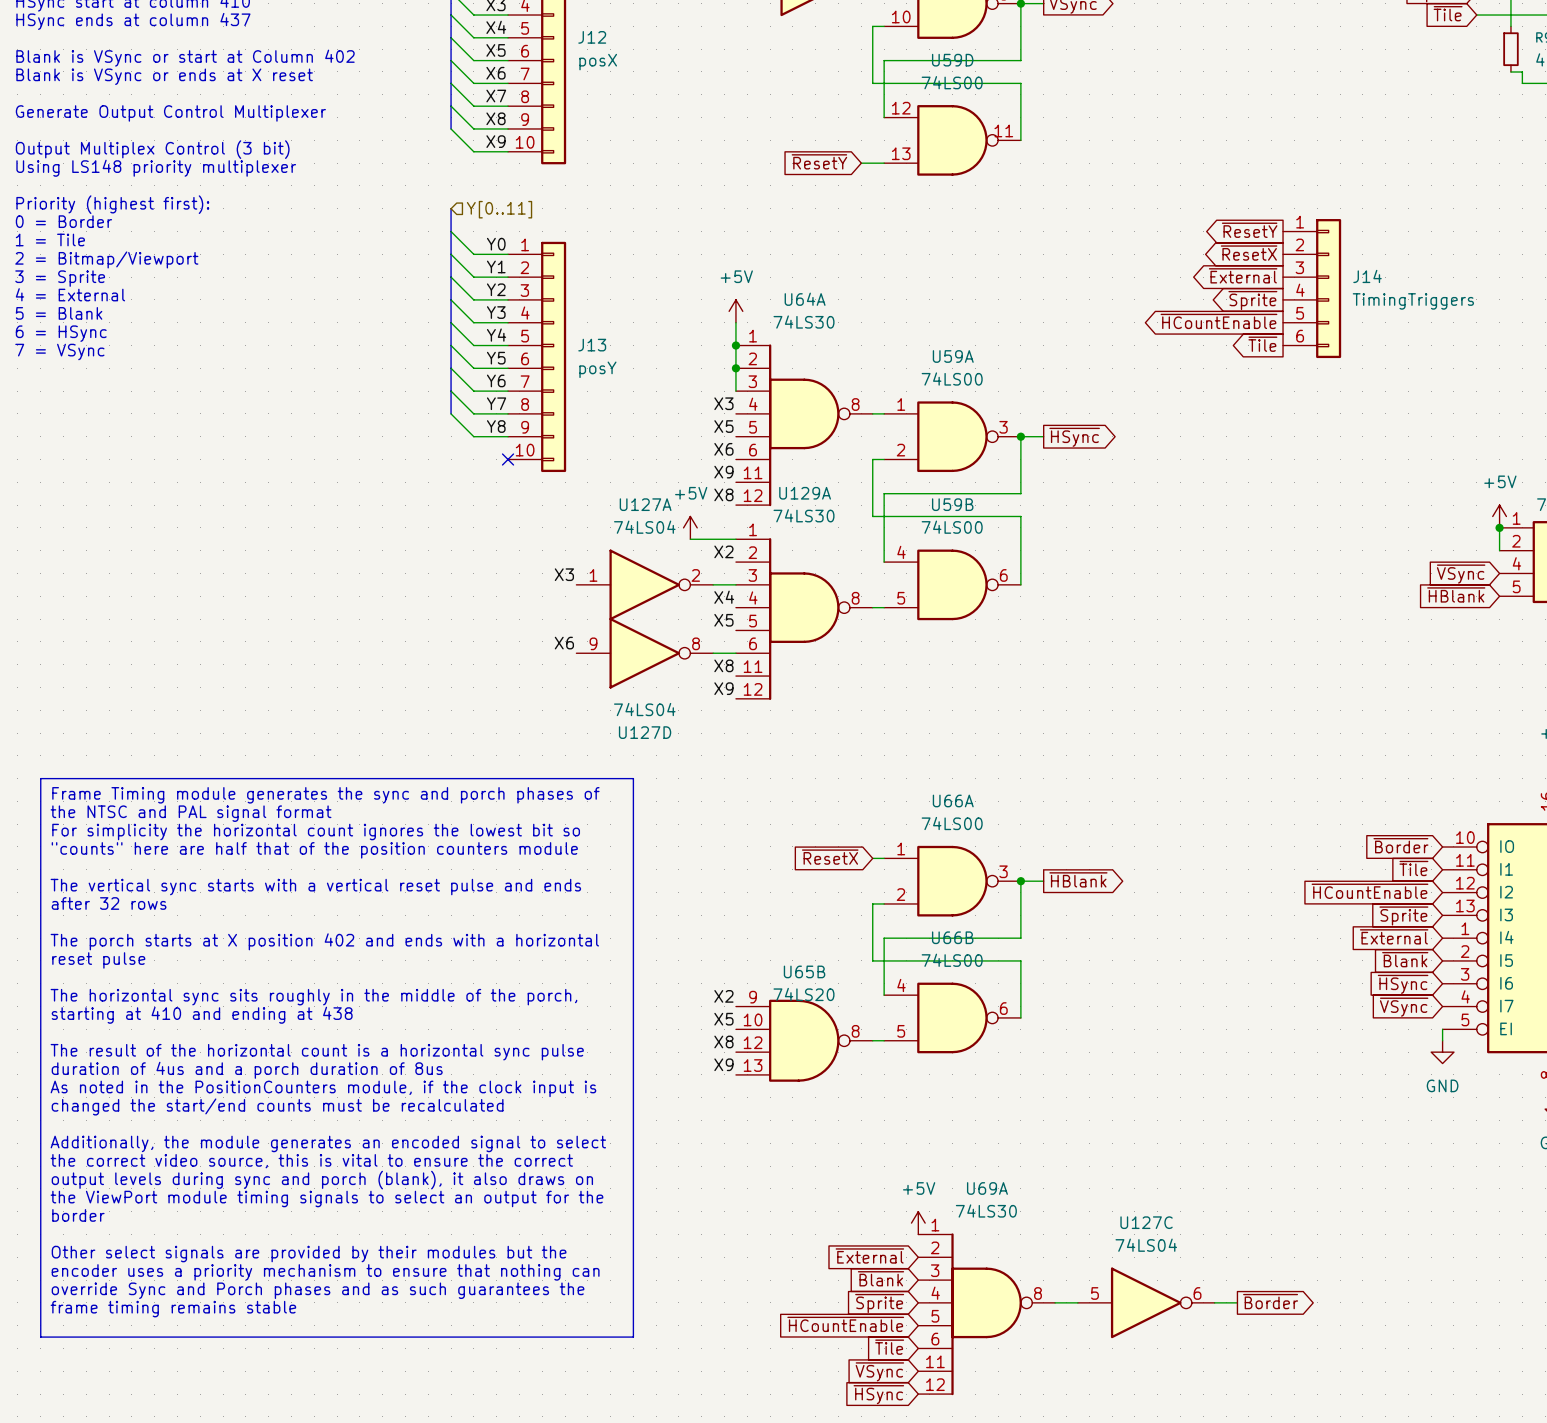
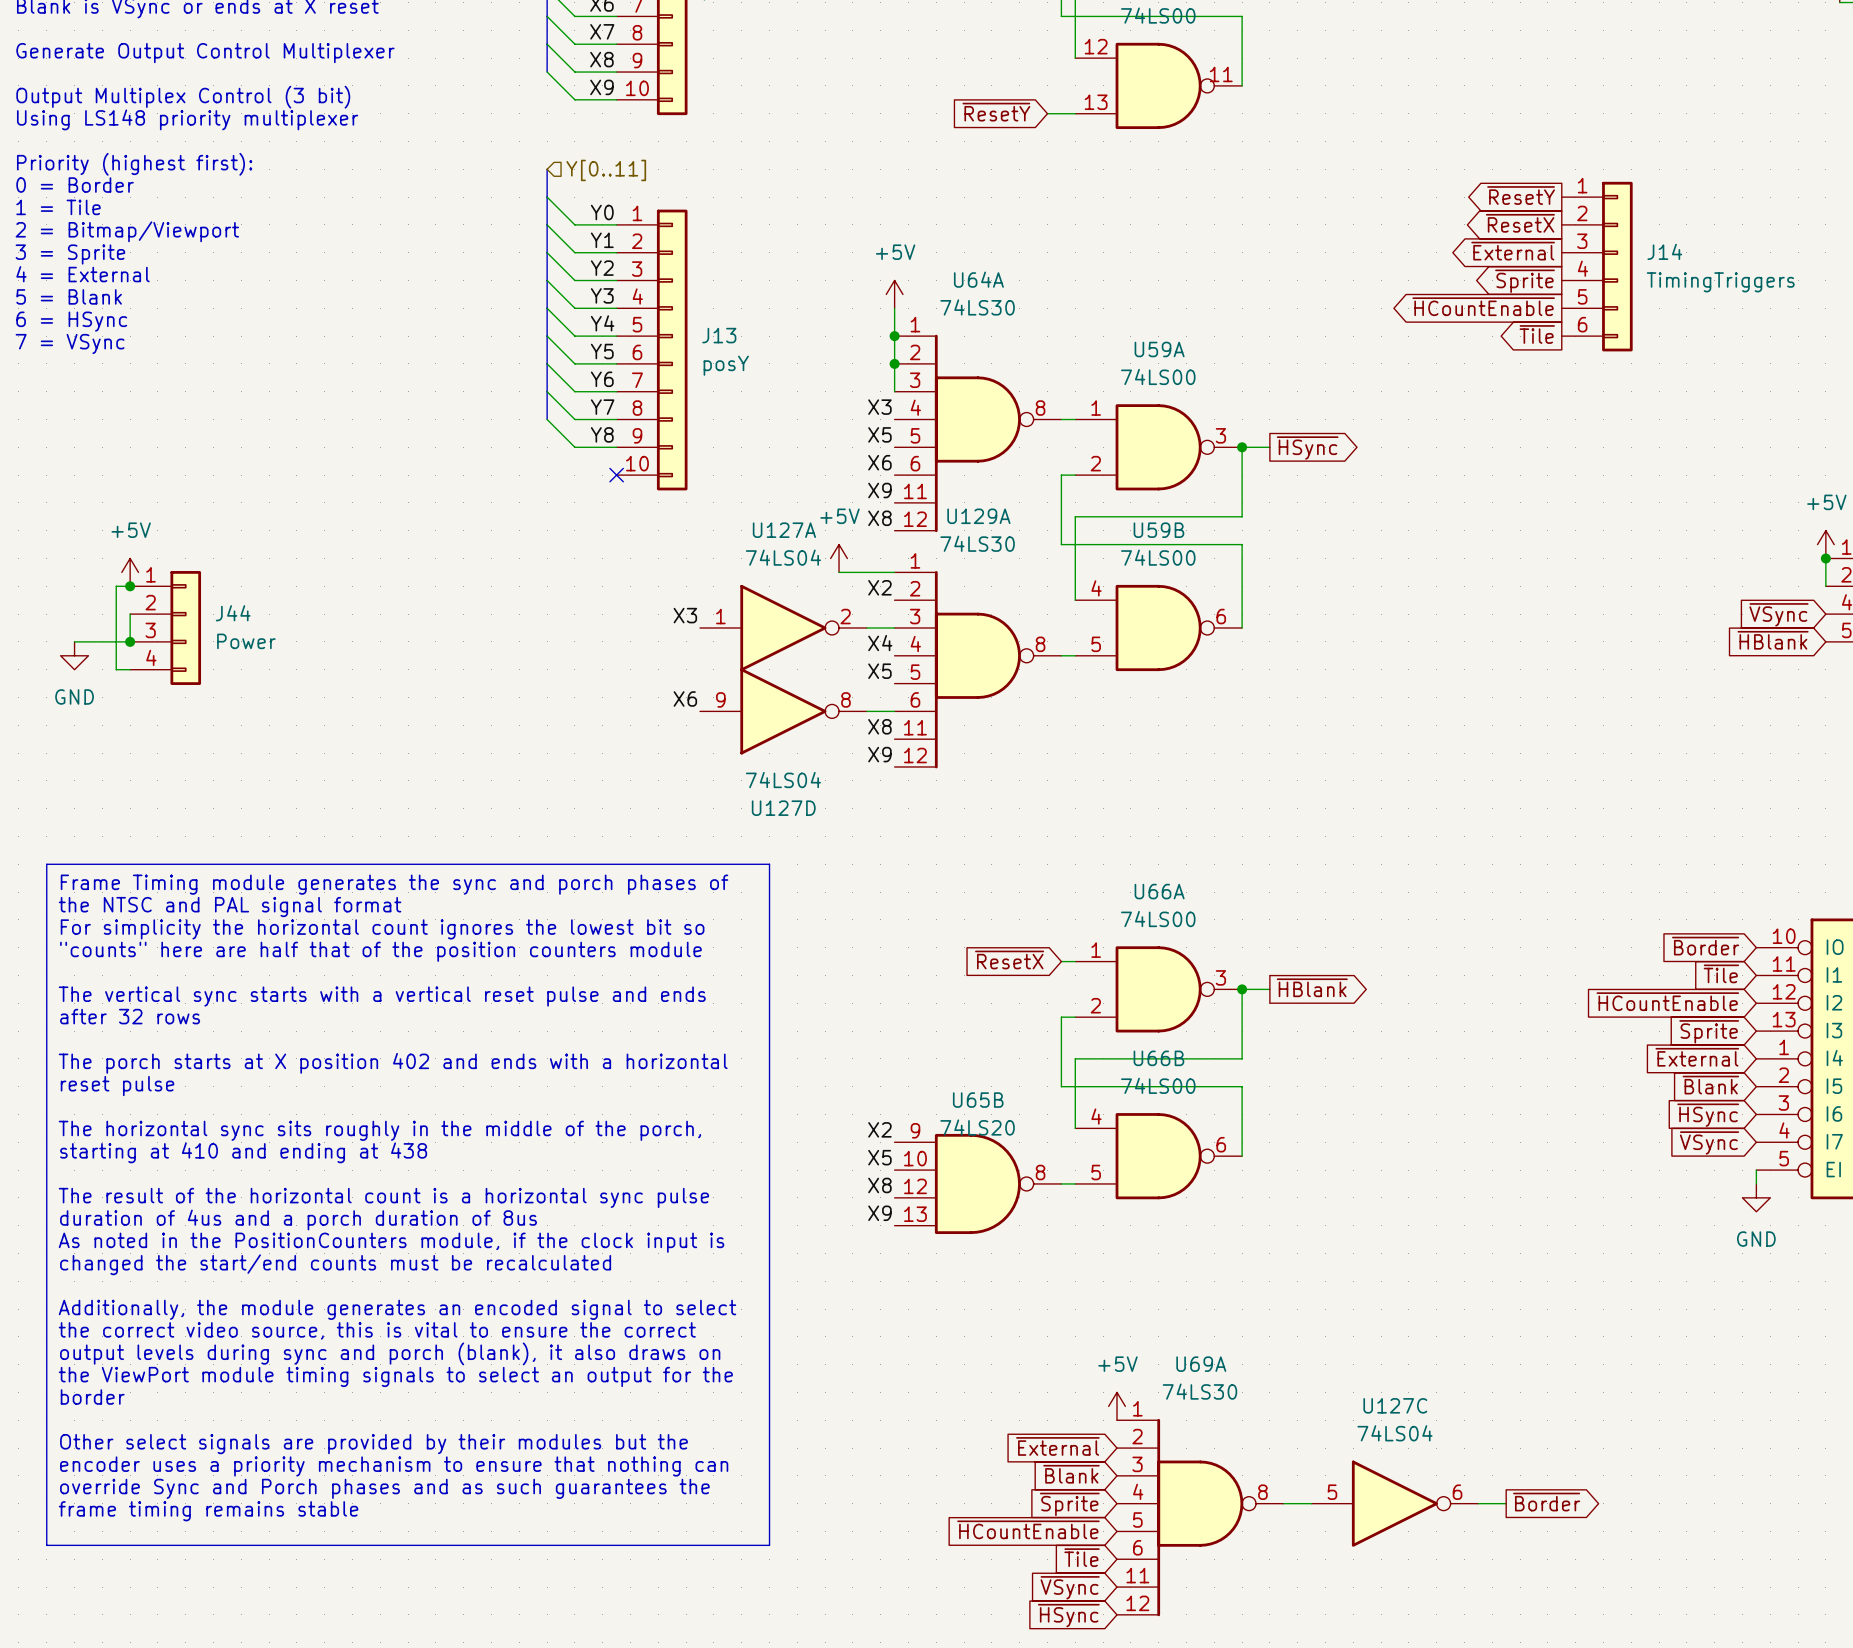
power symbol: none -> +5V (130, 572)
wire: none -> (130, 586) (116, 586) (116, 669) (130, 669)
junction: none -> (130, 586)
wire: none -> (130, 614) (130, 641) (74, 641)
J44: none -> Power (165, 628)
junction: none -> (130, 641)
power symbol: none -> GND (74, 655)

